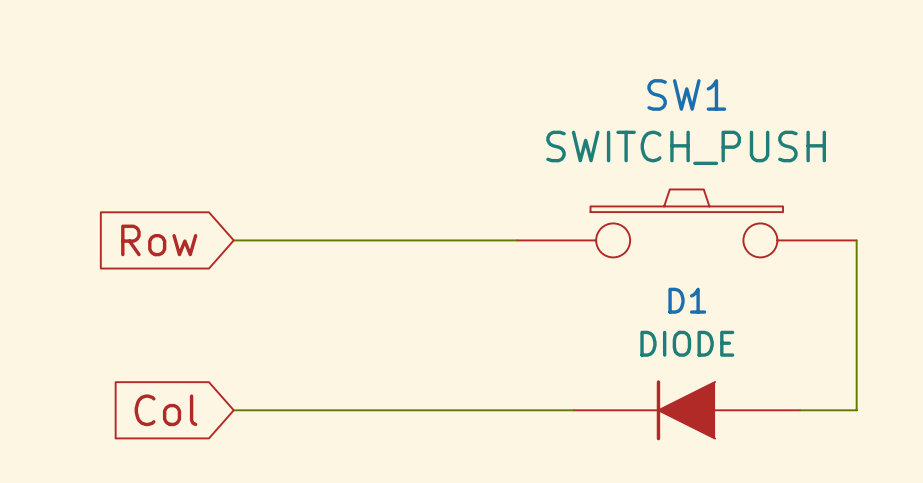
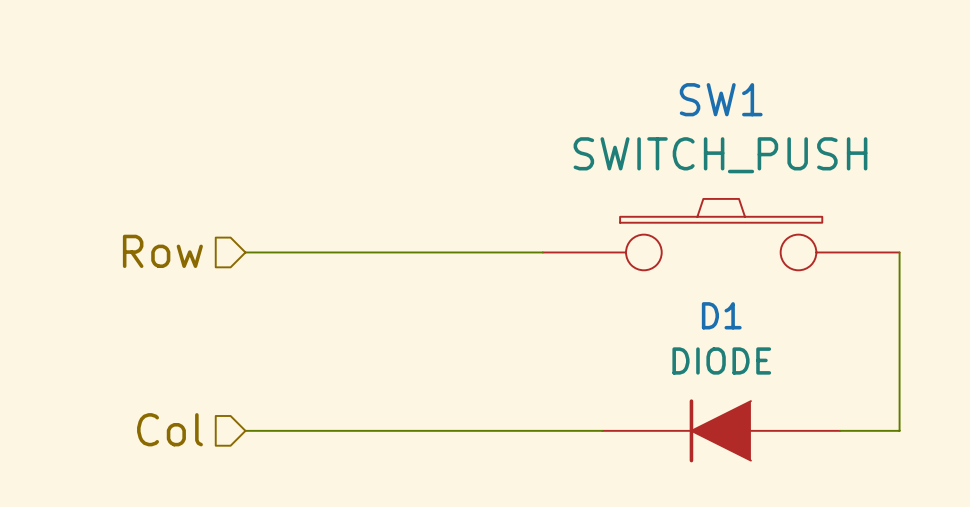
hierarchical label: none -> Row (162, 251)
global label: Row (159, 240) -> none
hierarchical label: none -> Col (169, 429)
global label: Col (165, 410) -> none

